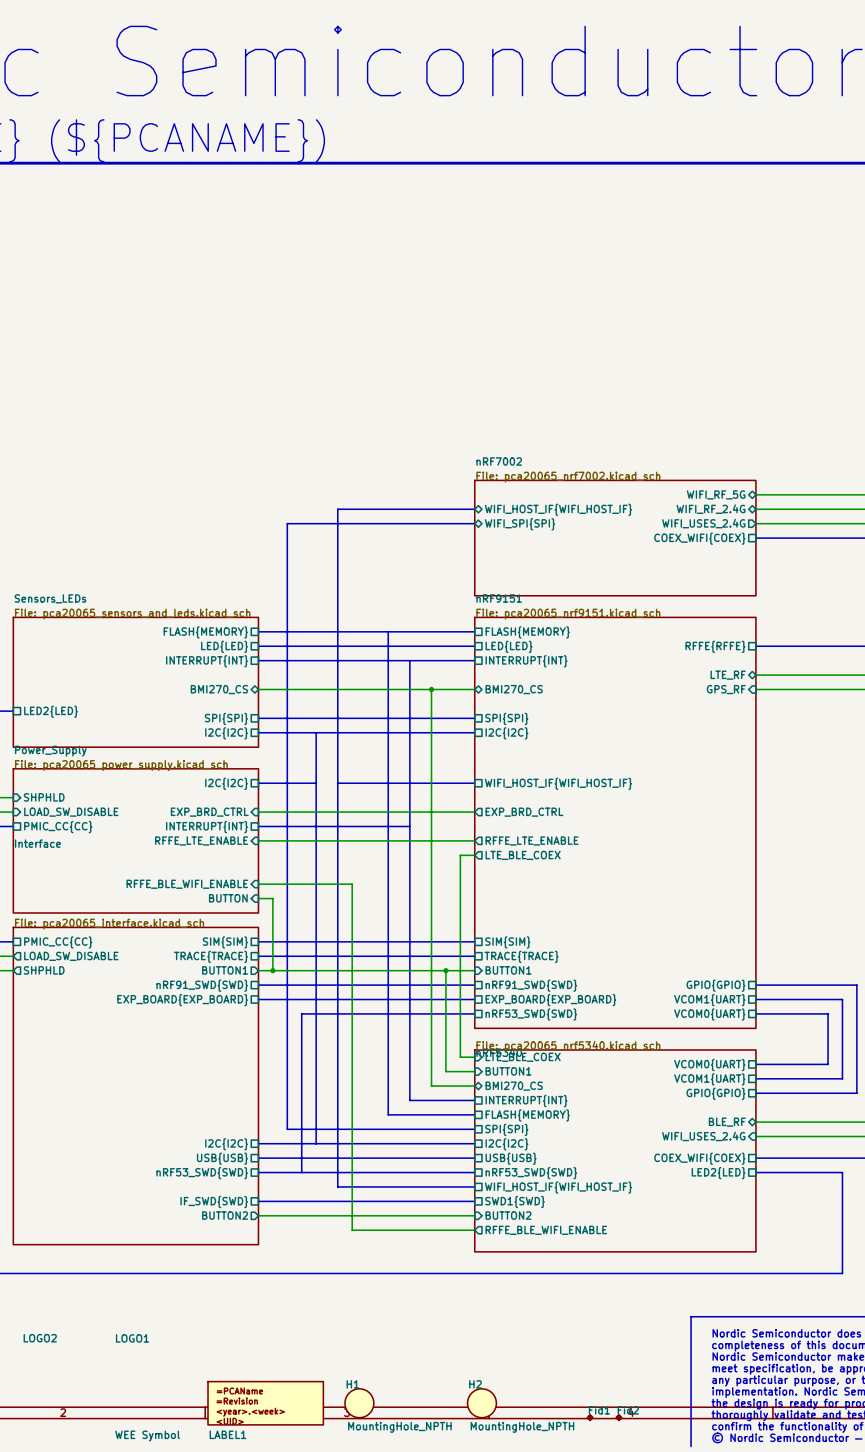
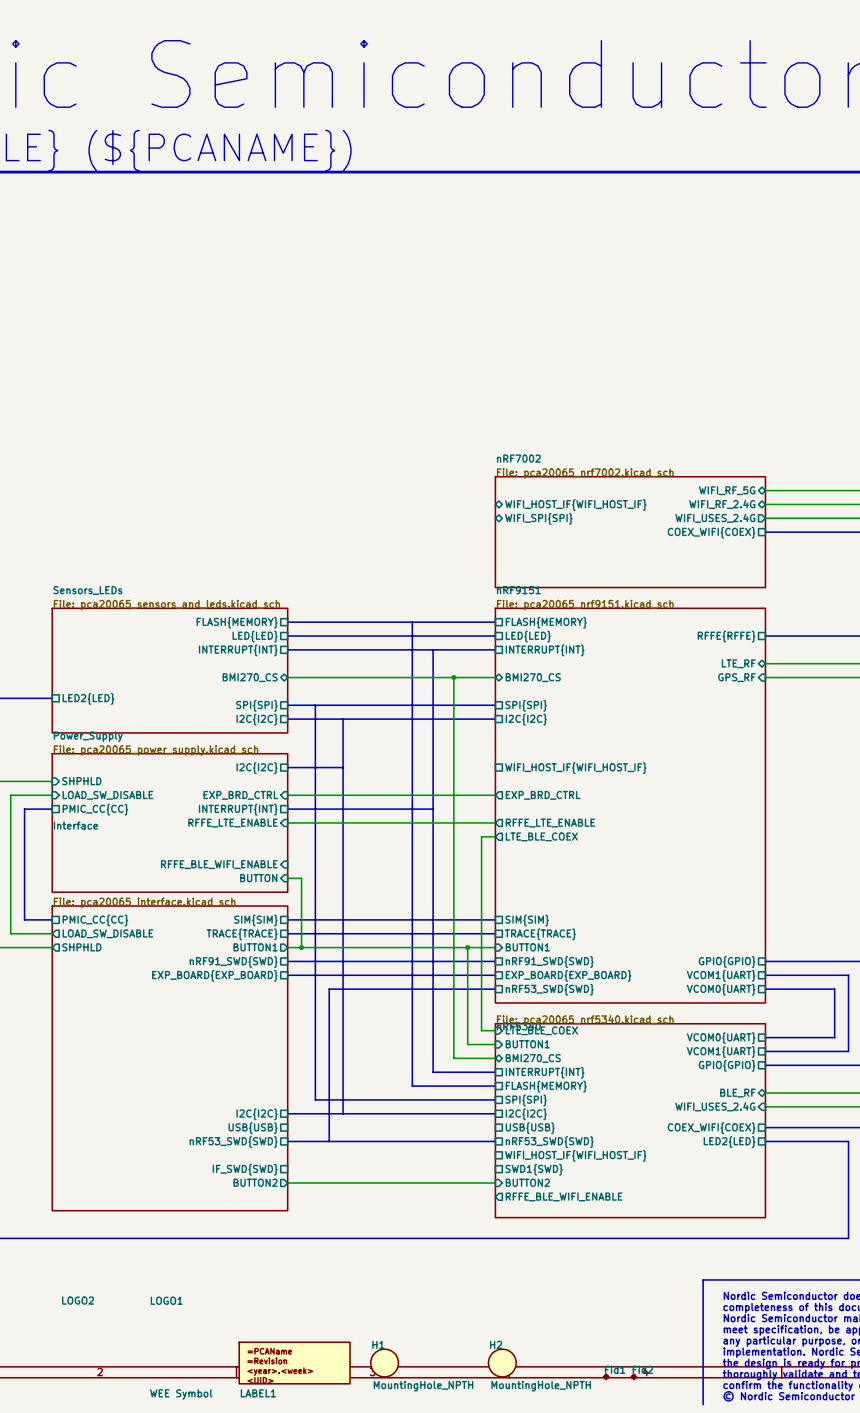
bus: (474, 509) (337, 509) (337, 1186) (474, 1186) -> none
bus: (474, 523) (287, 523) (287, 718) -> none
bus: (337, 783) (474, 783) -> none
wire: (258, 884) (352, 884) (352, 1230) (474, 1230) -> none
bus: (258, 1158) (474, 1158) -> none
bus: (258, 1201) (474, 1201) -> none

